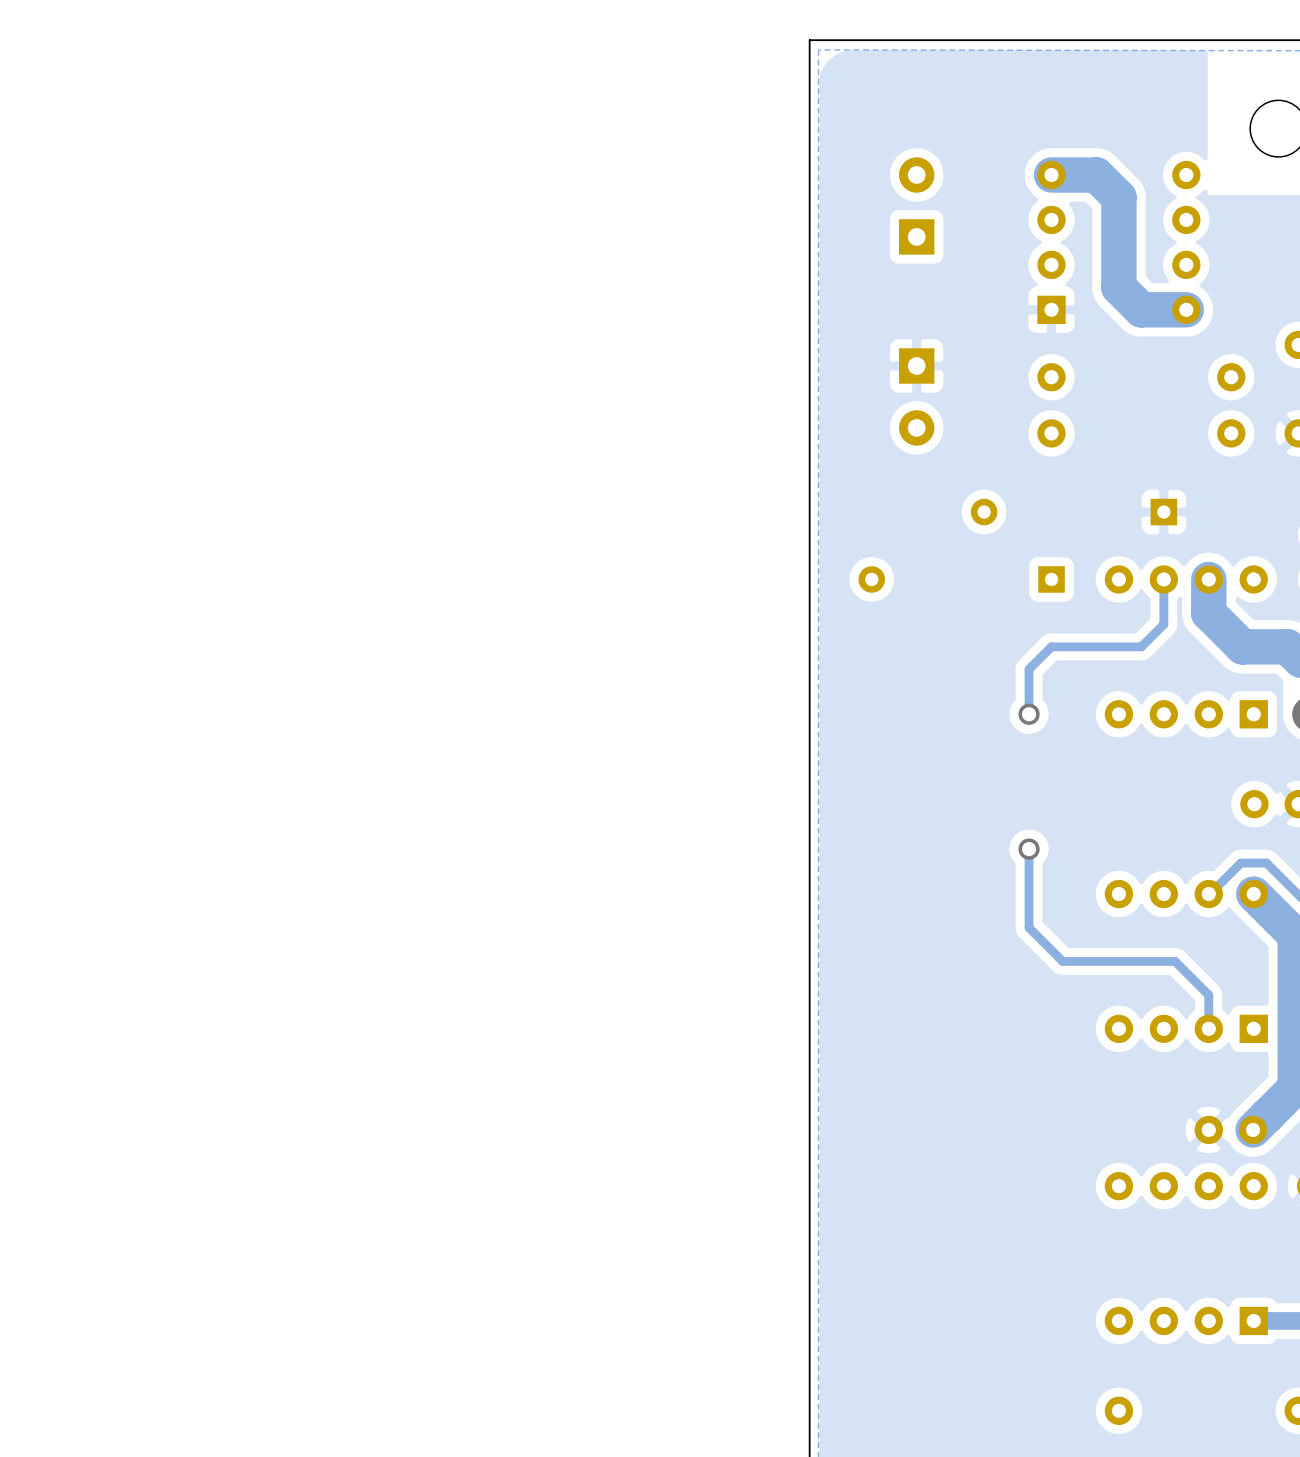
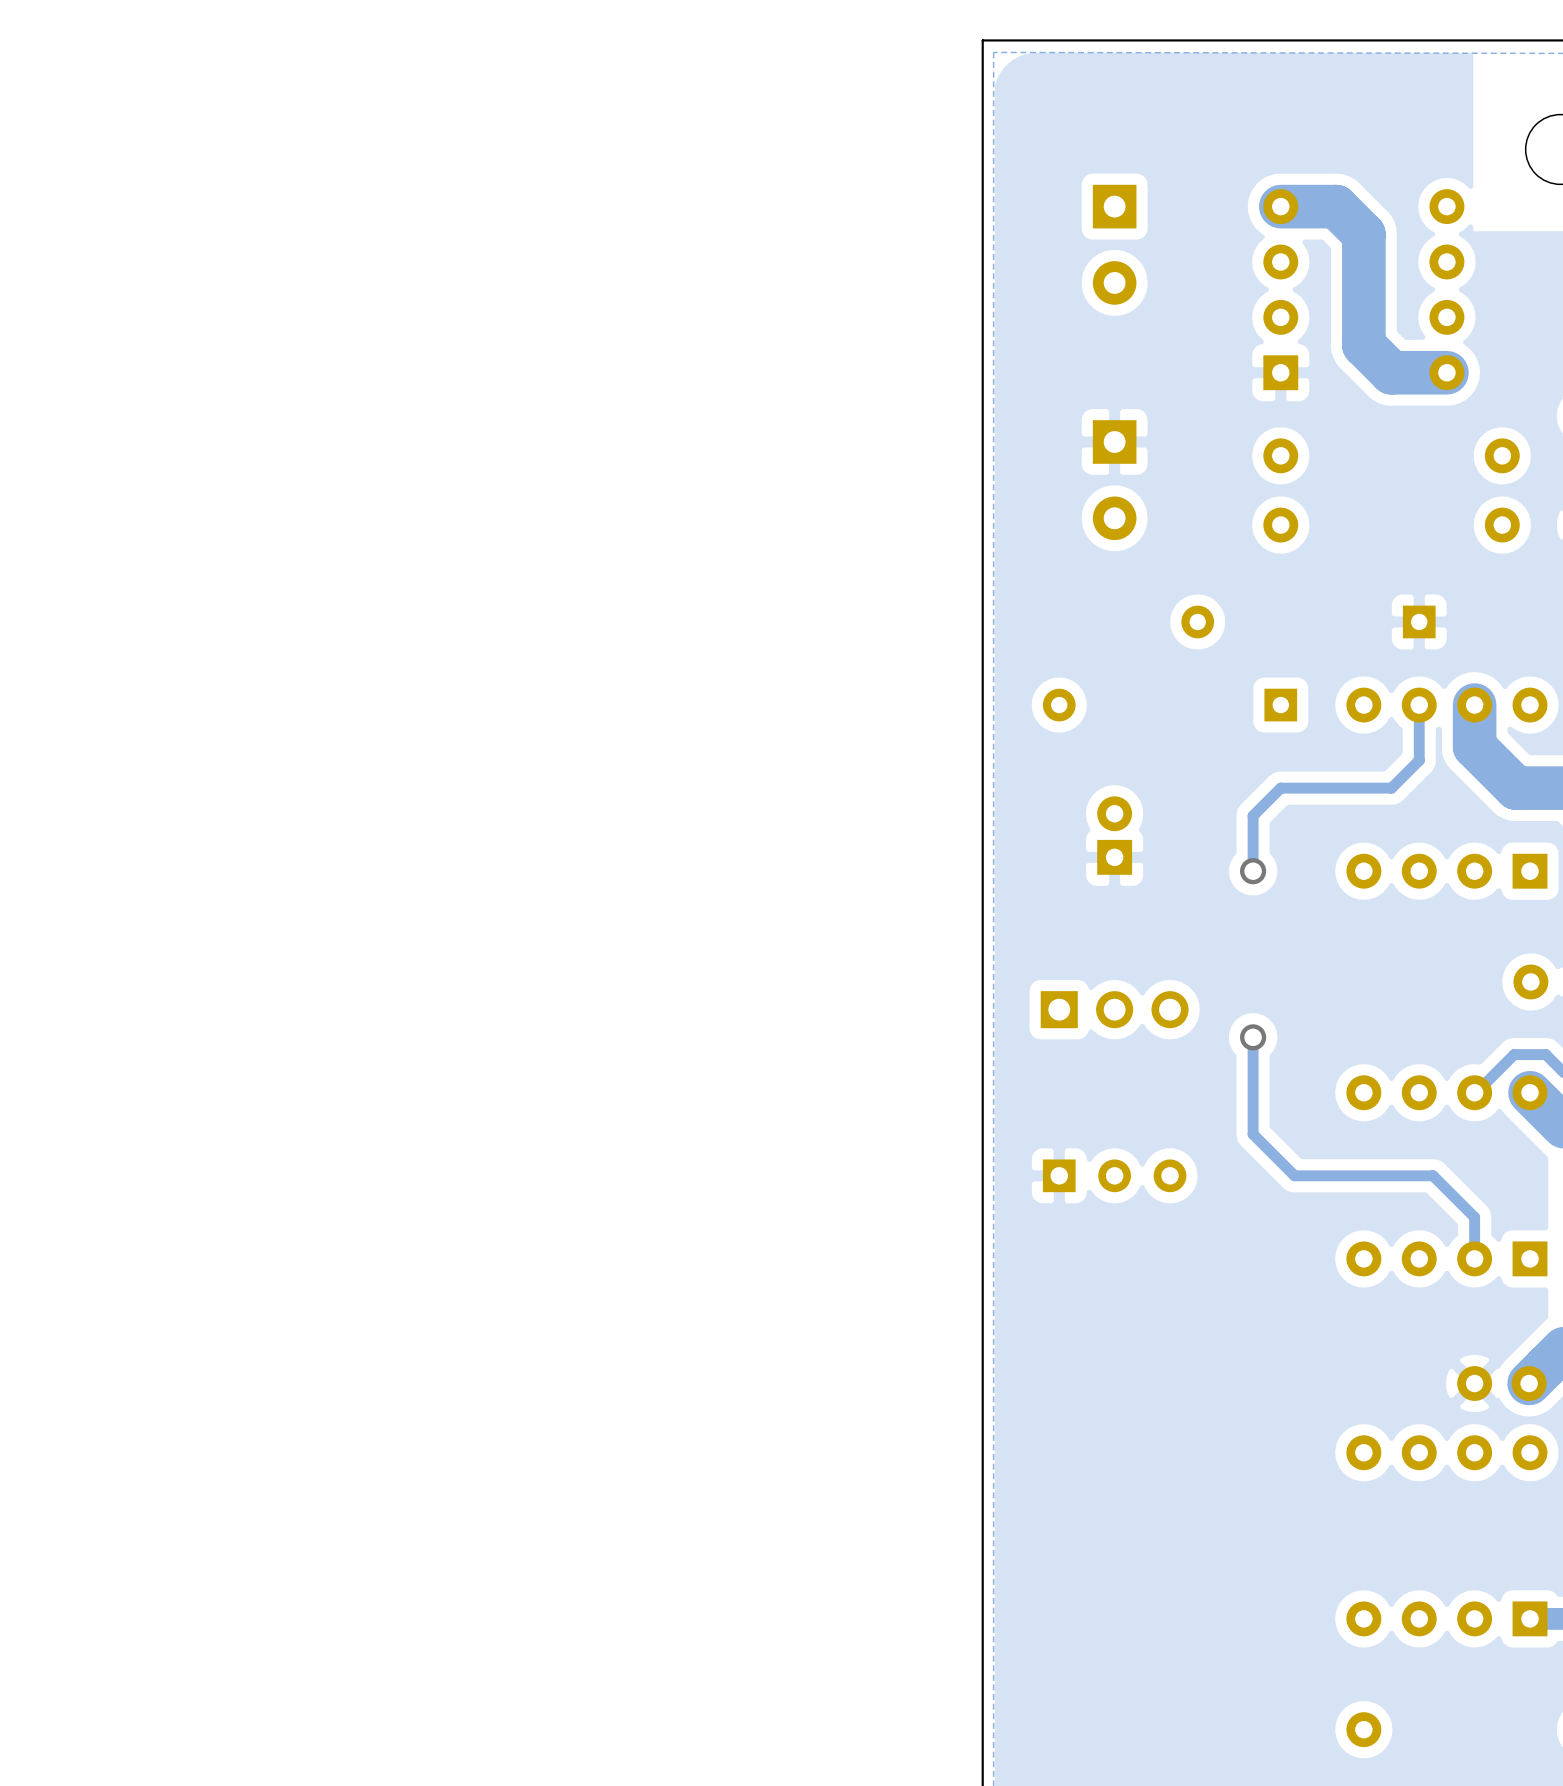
part rotation: 0° (916, 205) -> 180° (1114, 244)
part: none -> (1114, 835)
part: none -> (1114, 1009)
part: none -> (1114, 1175)

